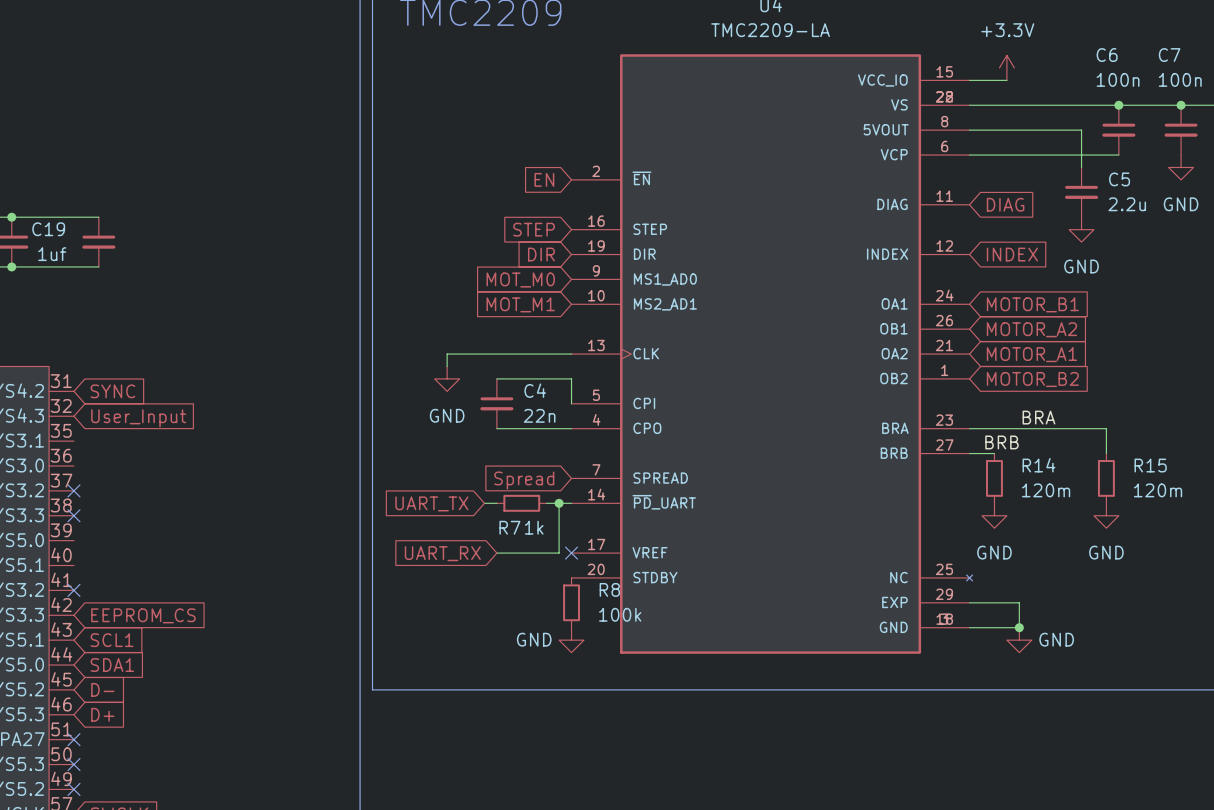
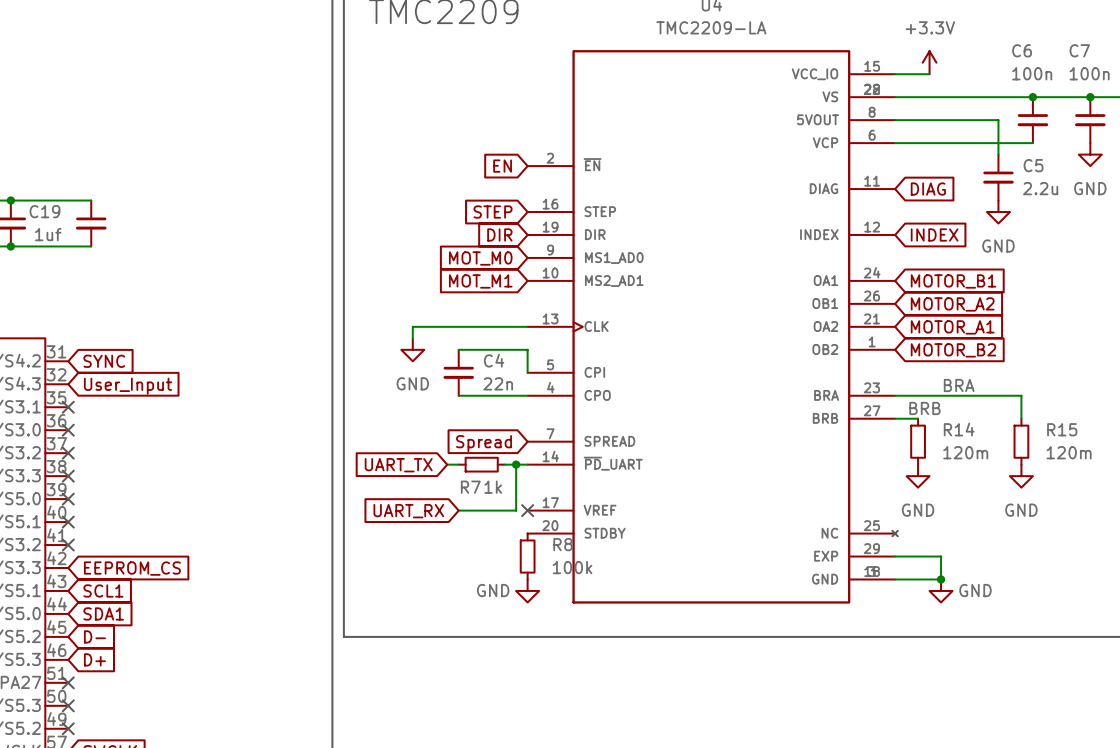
no-connect mark: none -> (68, 407)
no-connect mark: none -> (68, 430)
no-connect mark: none -> (68, 499)
no-connect mark: none -> (68, 522)

